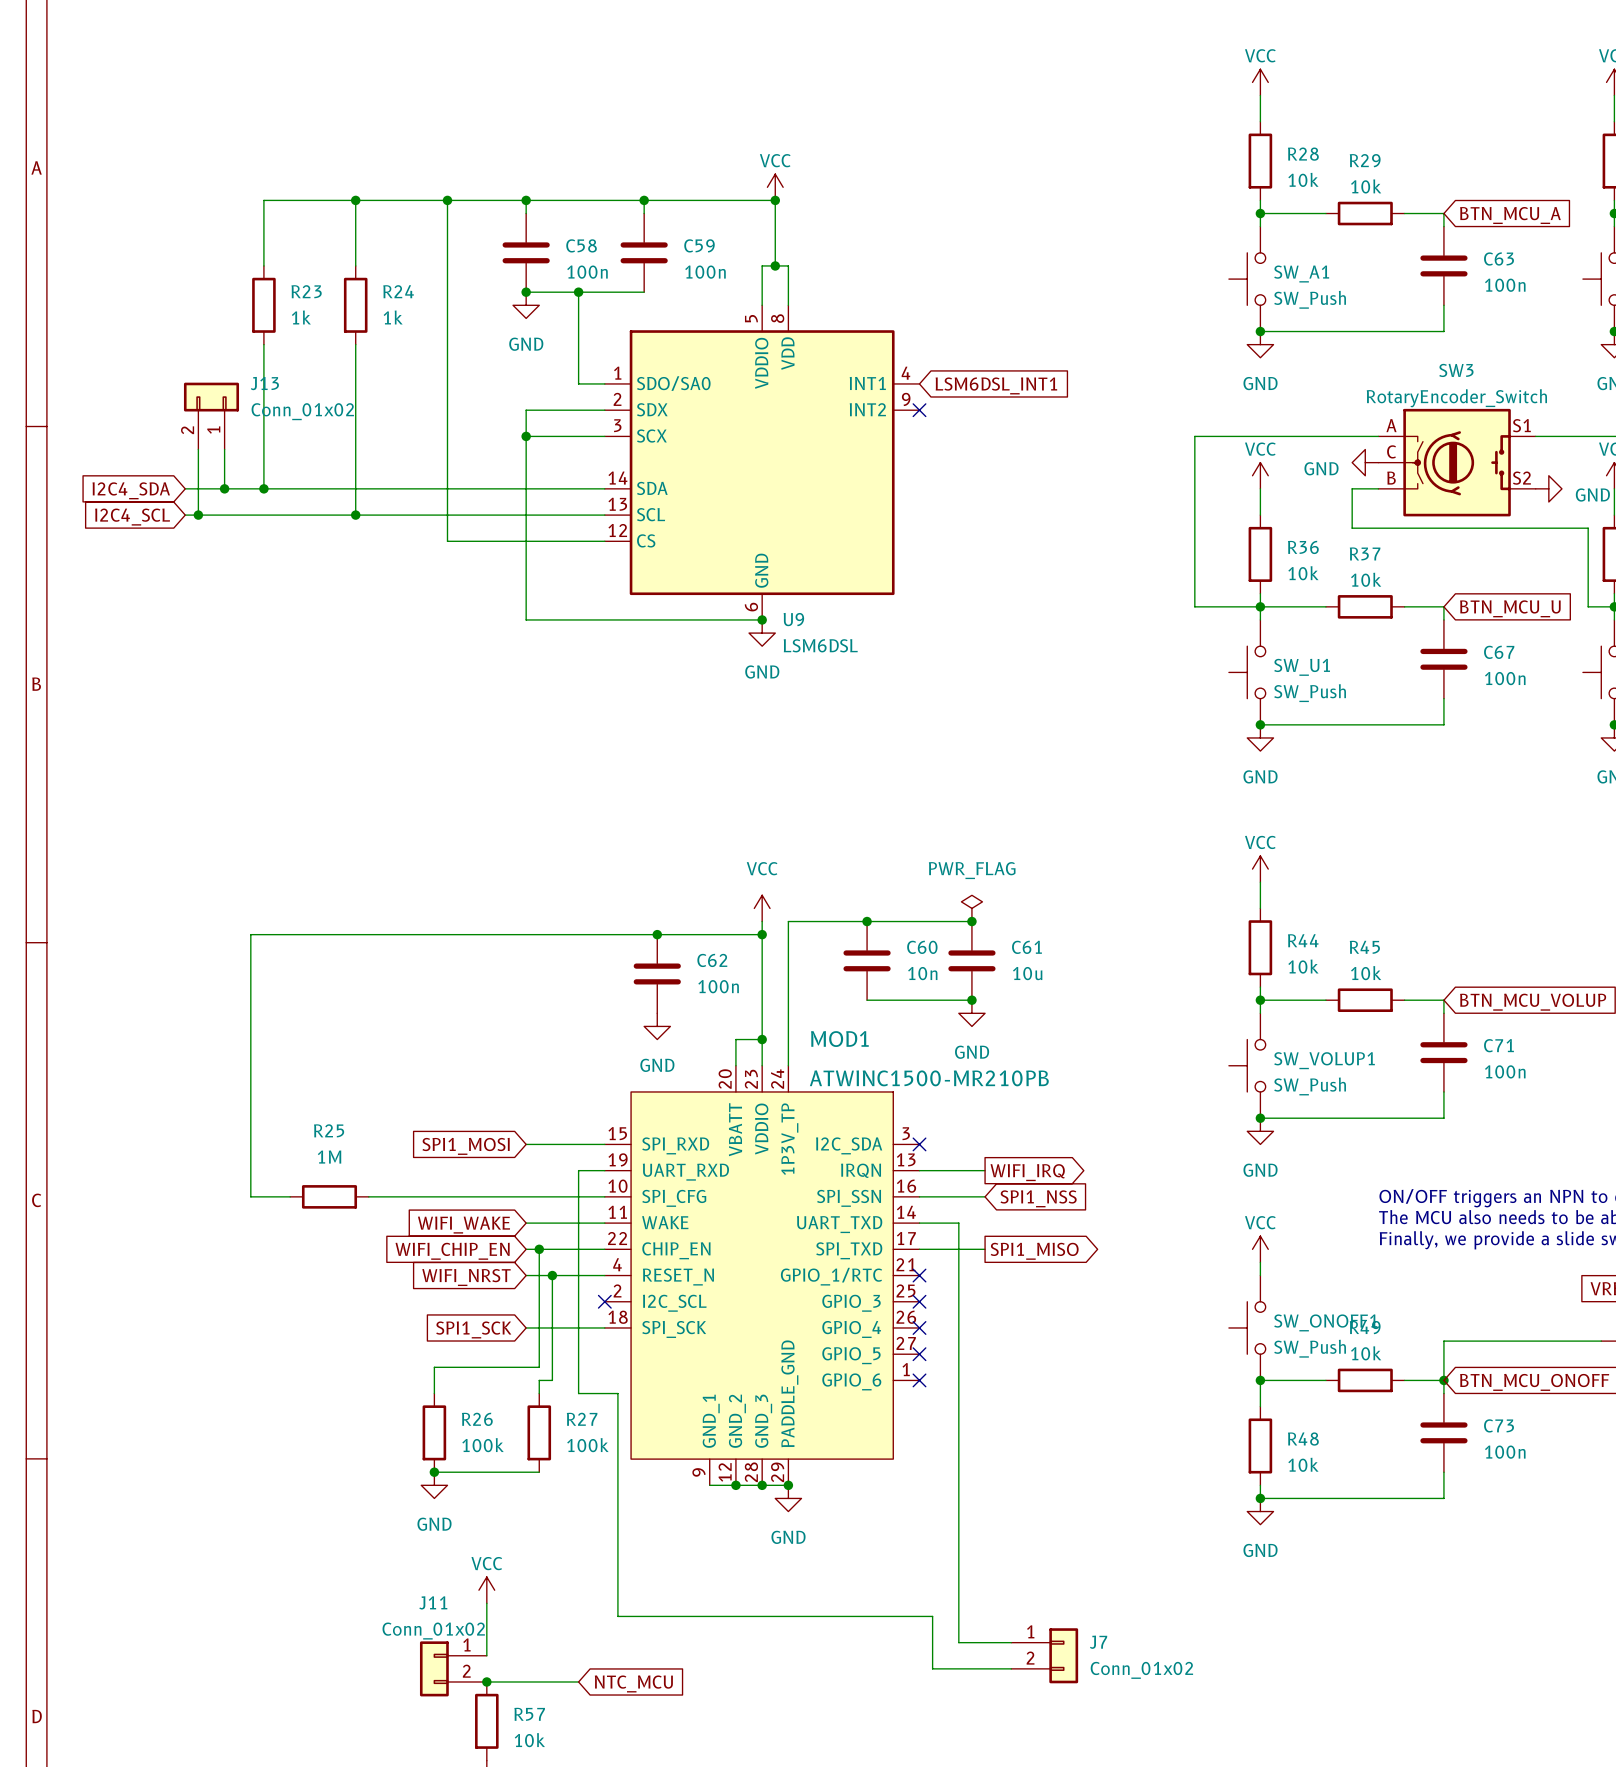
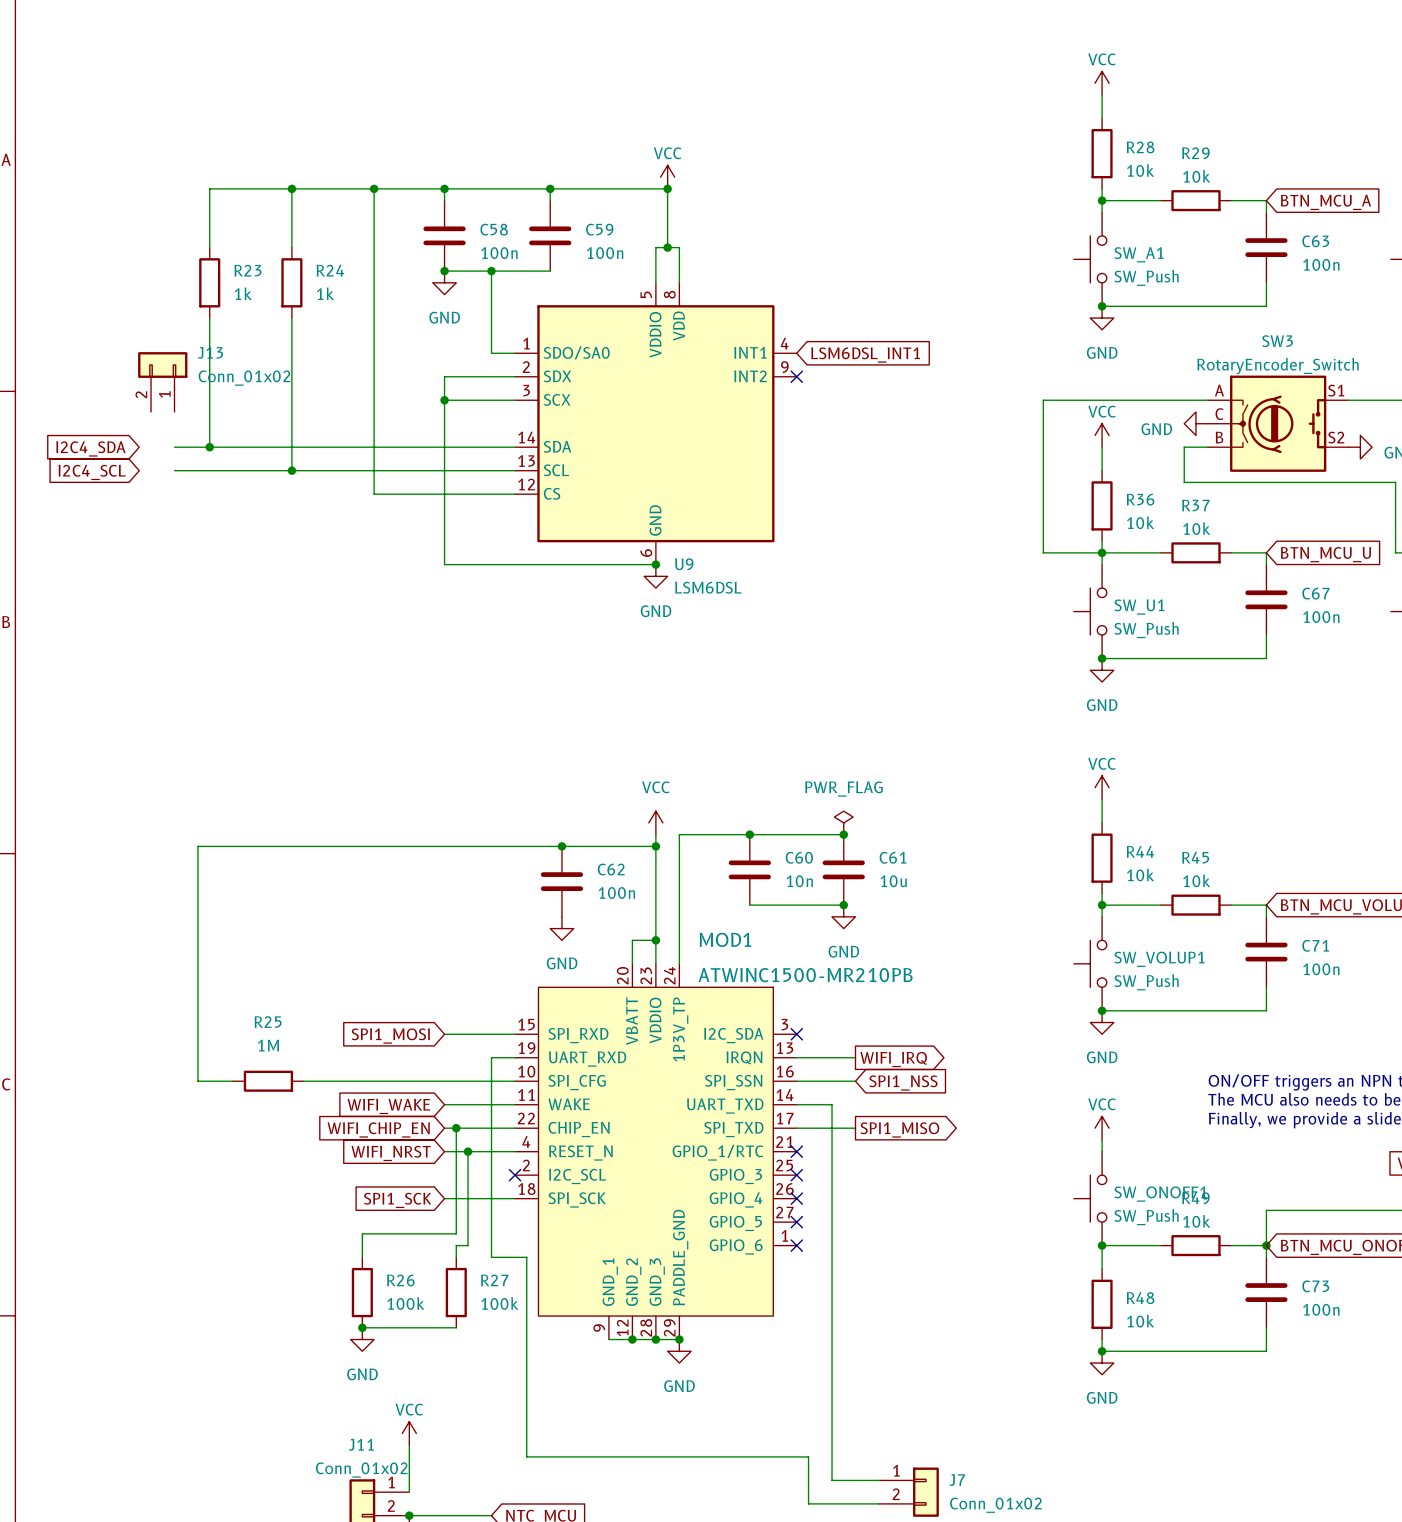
wire: (198, 449) (198, 515) -> none
wire: (224, 449) (224, 488) (185, 488) -> none
junction: (224, 488) -> none
wire: (185, 515) (224, 515) -> none
junction: (198, 515) -> none

